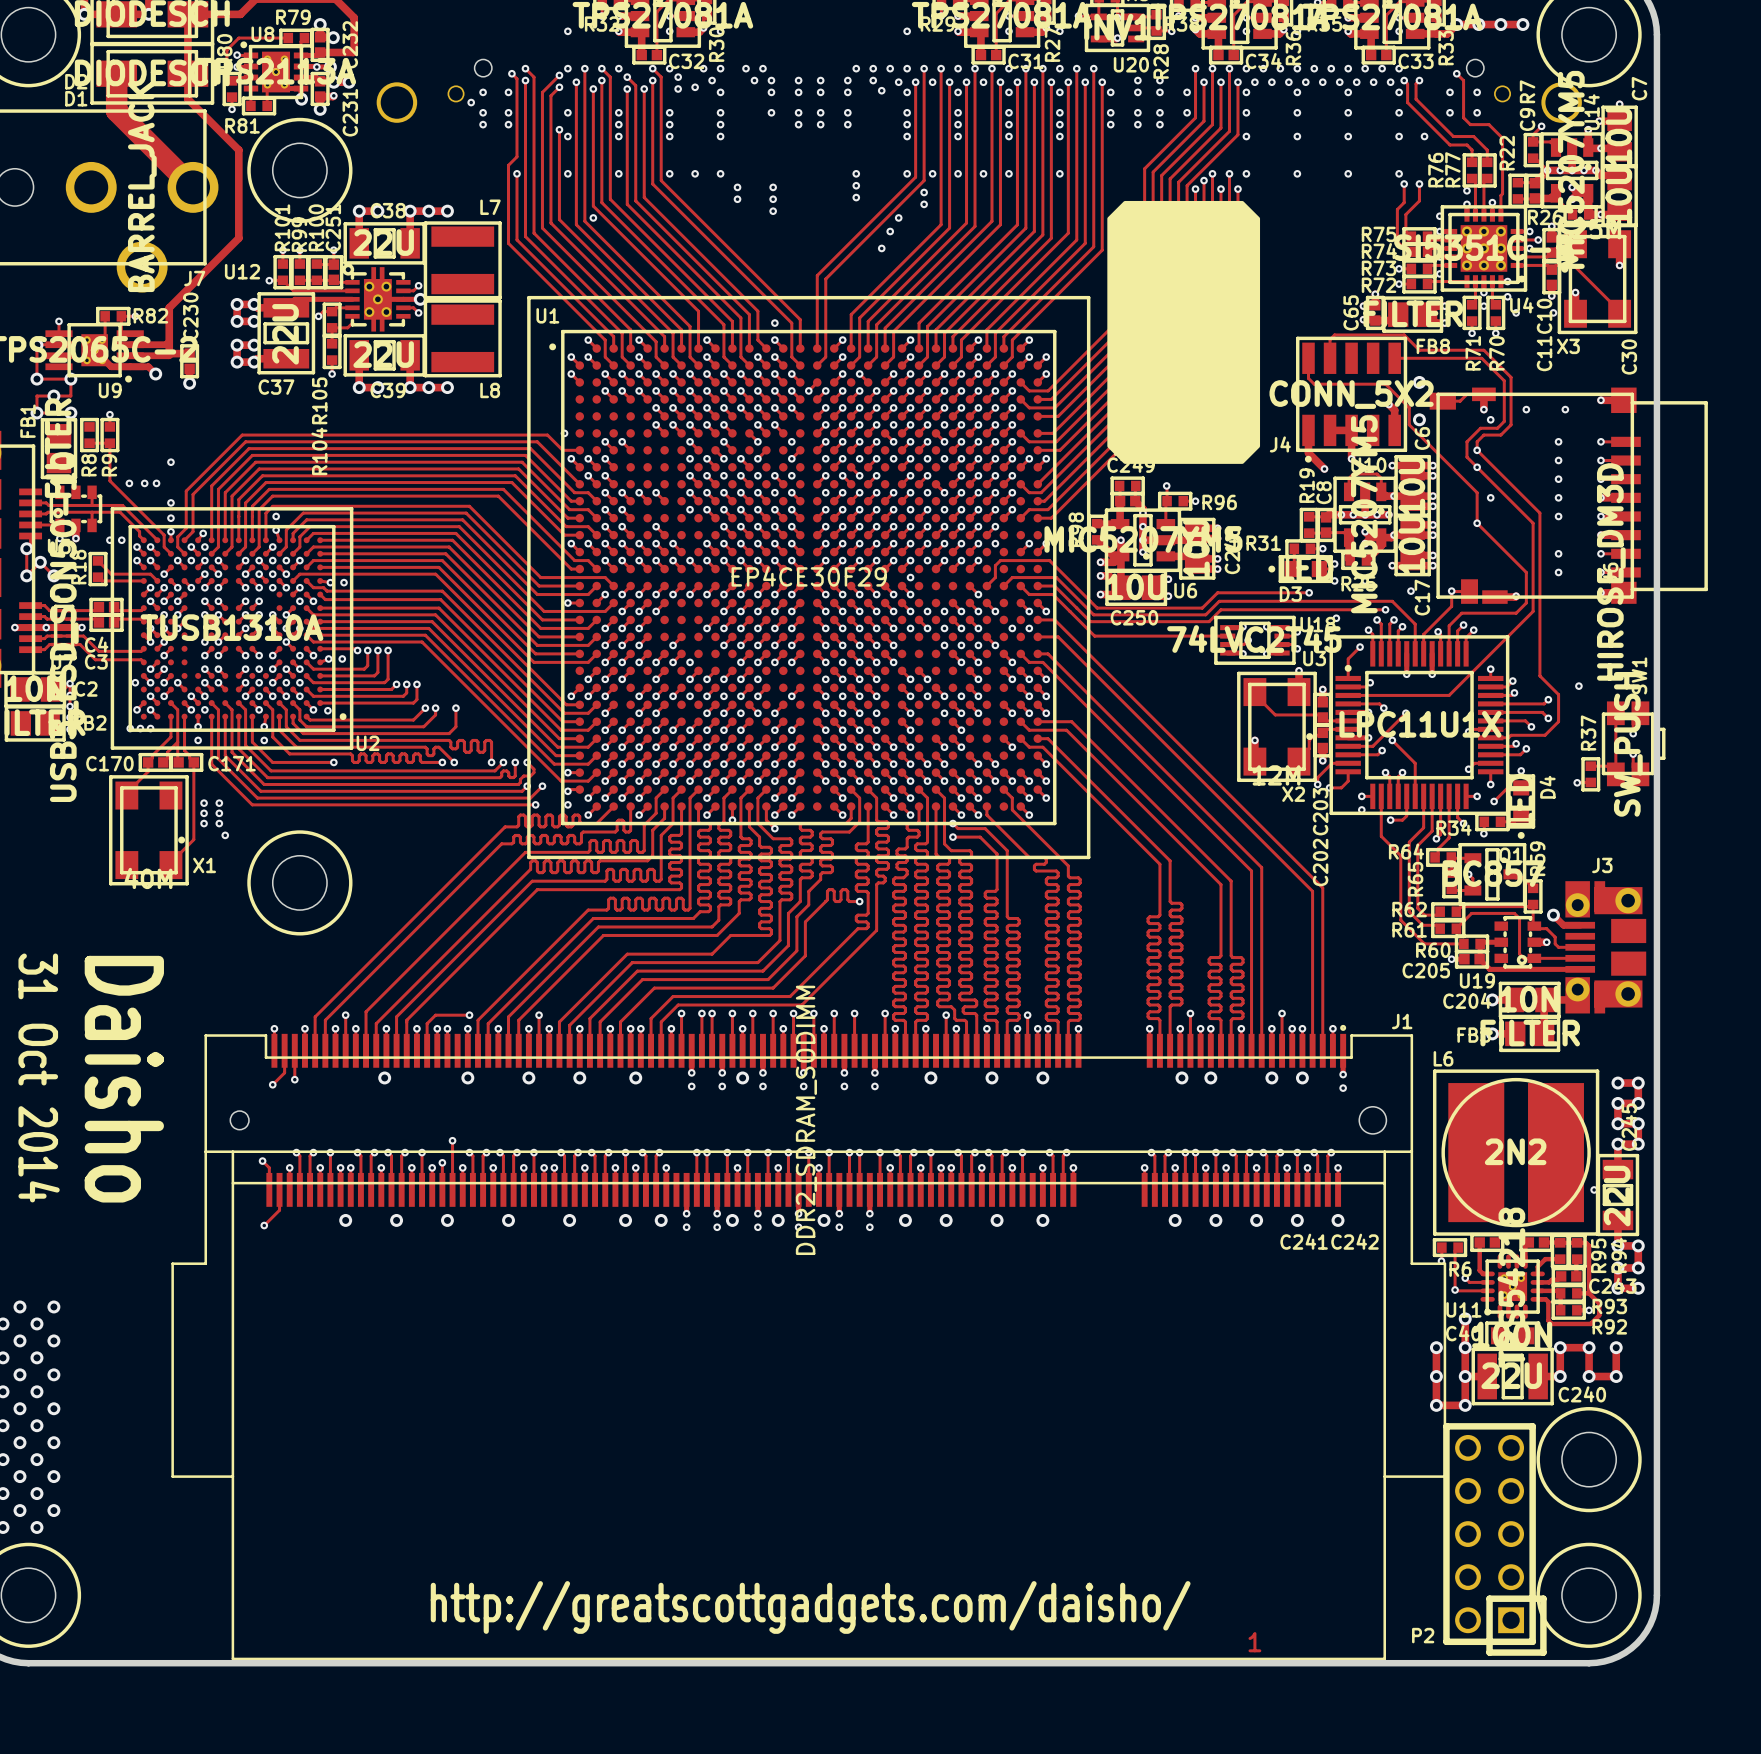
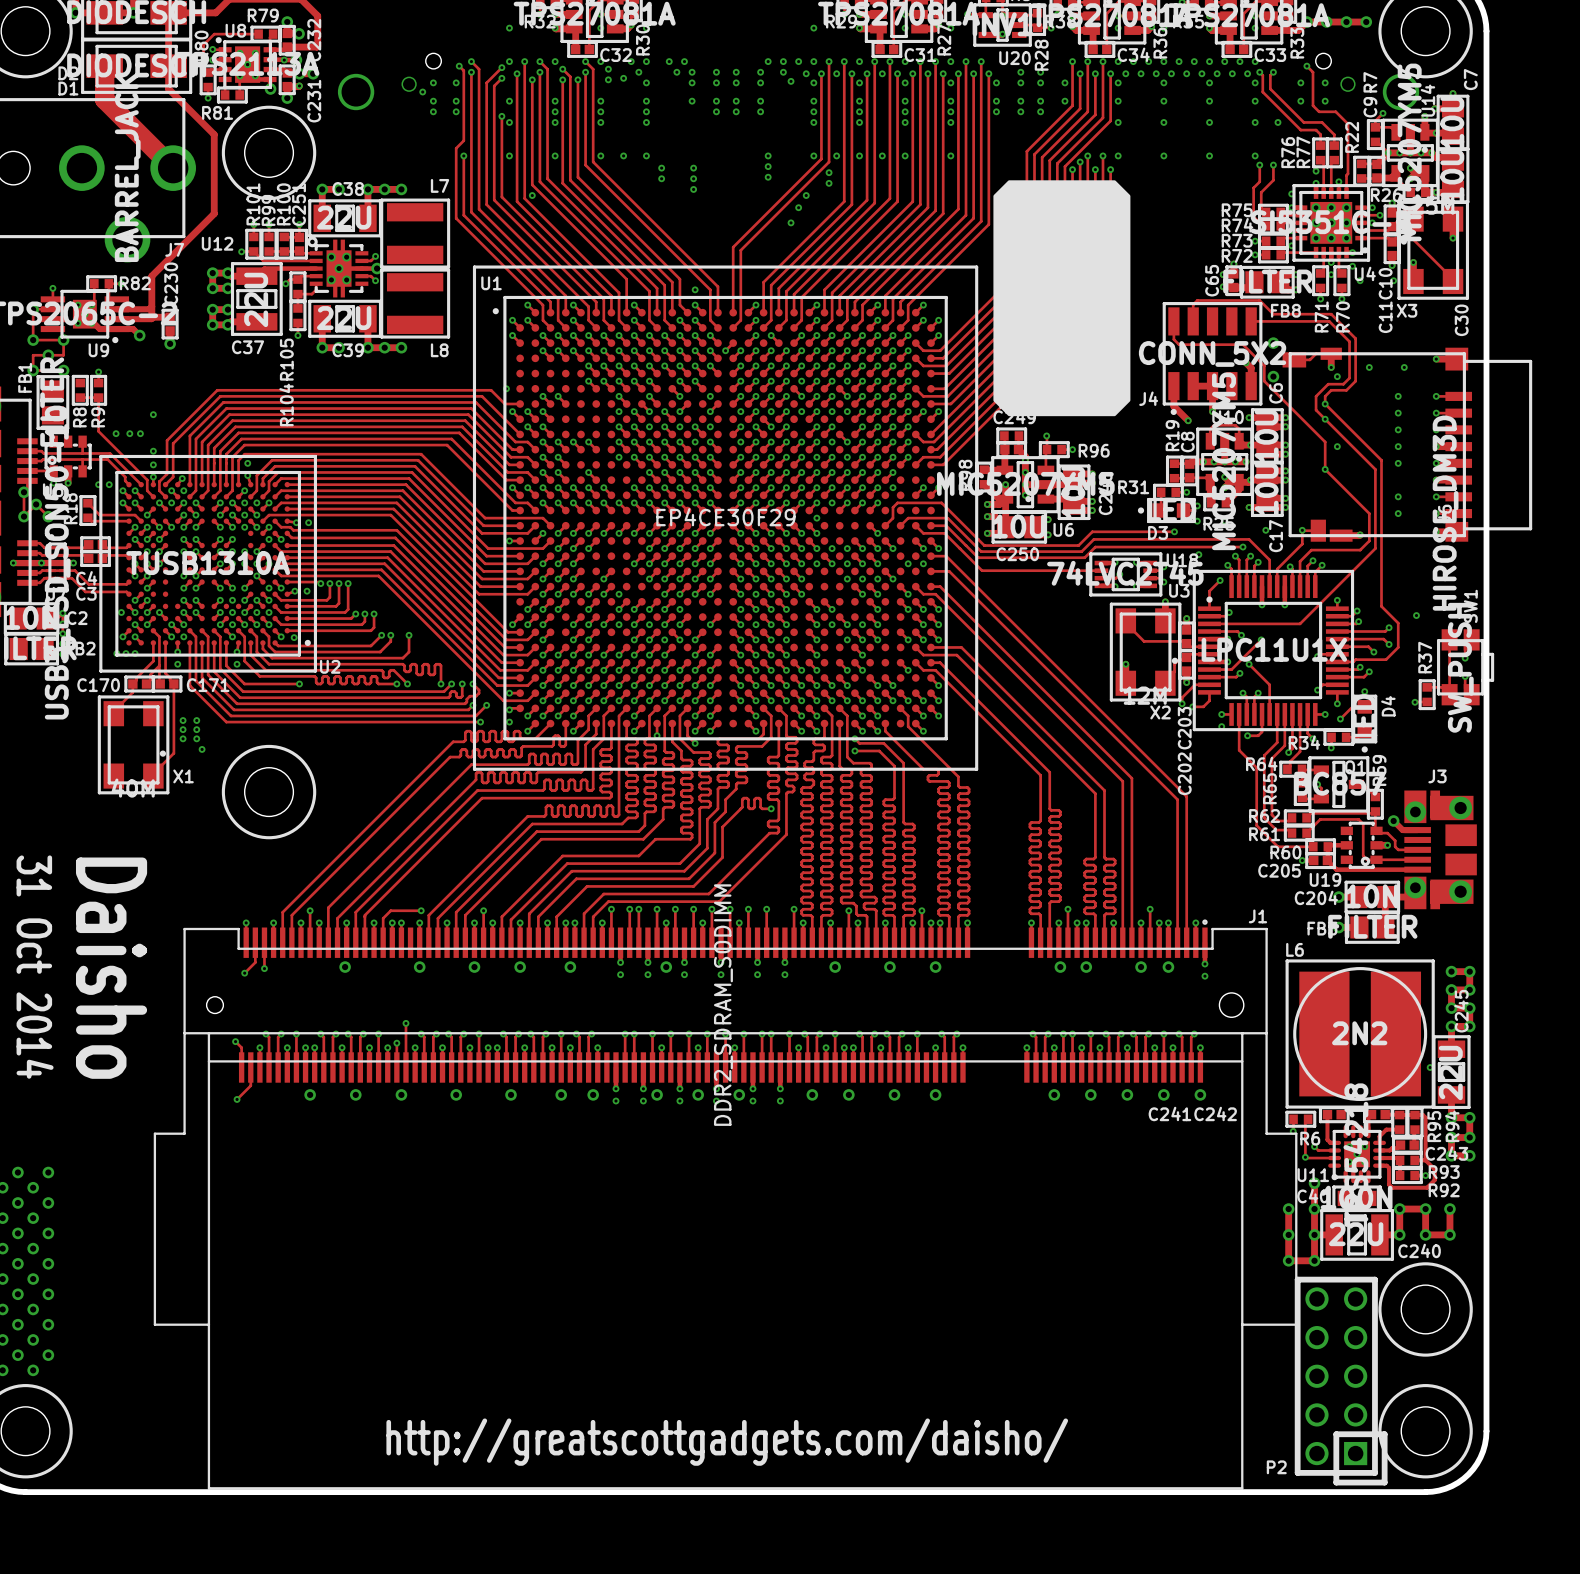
text: 1 (1254, 1642) -> none

